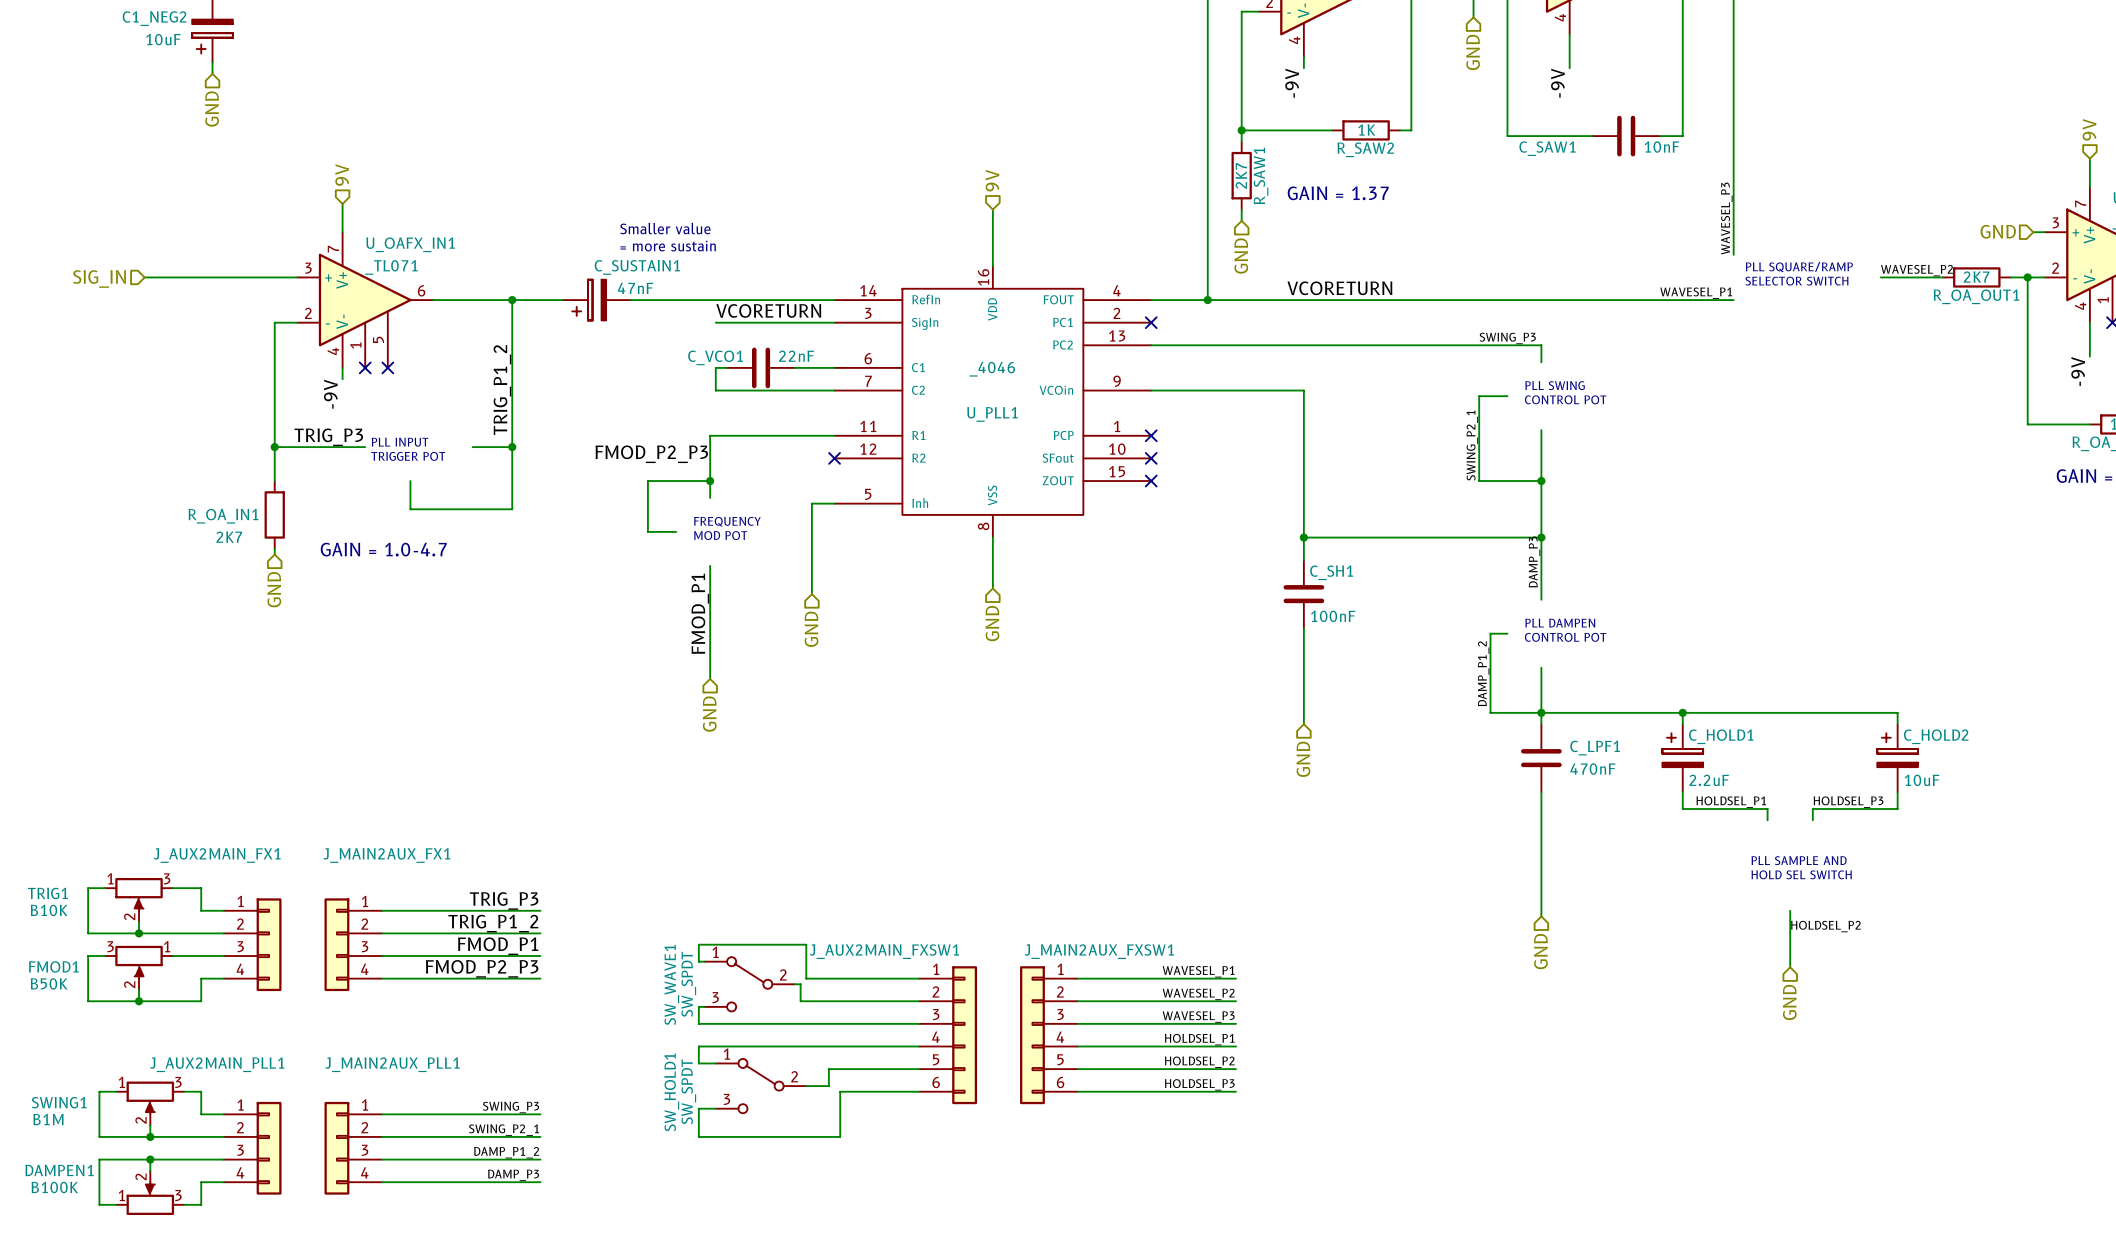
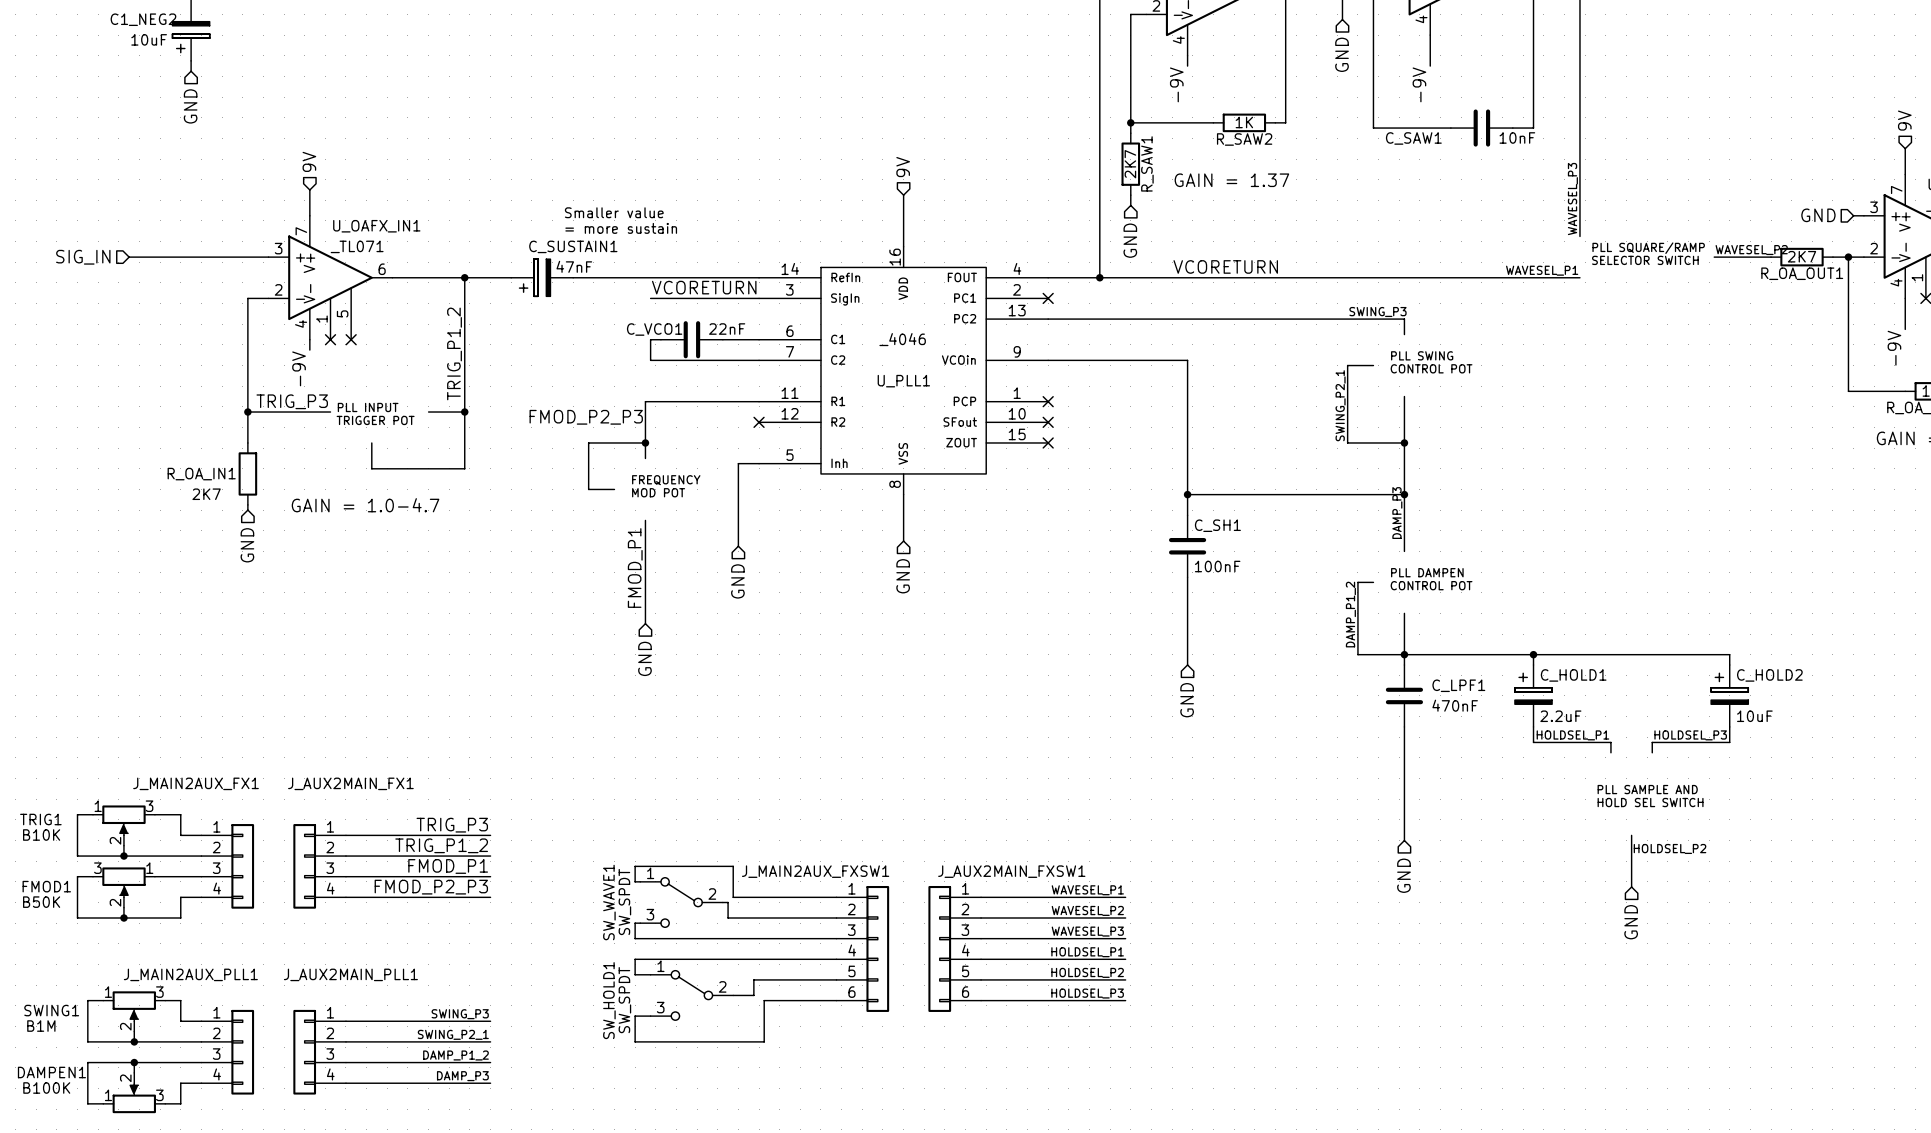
J_AUX2MAIN_FX1 name: J_AUX2MAIN_FX1 (217, 855) -> J_MAIN2AUX_FX1 (196, 783)
J_MAIN2AUX_FX1 name: J_MAIN2AUX_FX1 (386, 855) -> J_AUX2MAIN_FX1 (350, 783)
J_AUX2MAIN_FXSW1 name: J_AUX2MAIN_FXSW1 (884, 951) -> J_MAIN2AUX_FXSW1 (815, 871)
J_MAIN2AUX_FXSW1 name: J_MAIN2AUX_FXSW1 (1099, 951) -> J_AUX2MAIN_FXSW1 (1011, 871)
J_AUX2MAIN_PLL1 name: J_AUX2MAIN_PLL1 (217, 1064) -> J_MAIN2AUX_PLL1 (190, 974)
J_MAIN2AUX_PLL1 name: J_MAIN2AUX_PLL1 (392, 1064) -> J_AUX2MAIN_PLL1 (350, 974)

